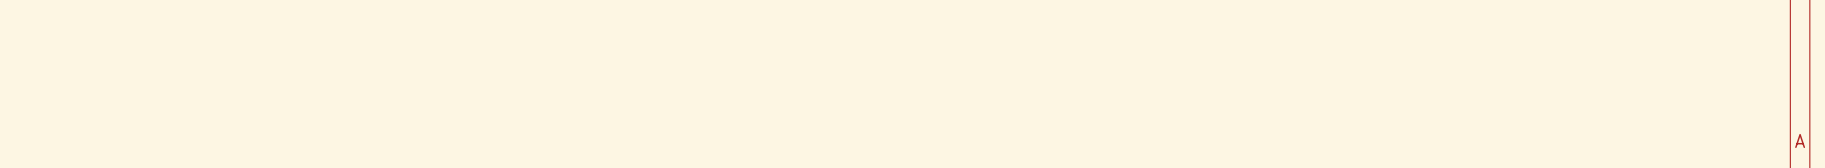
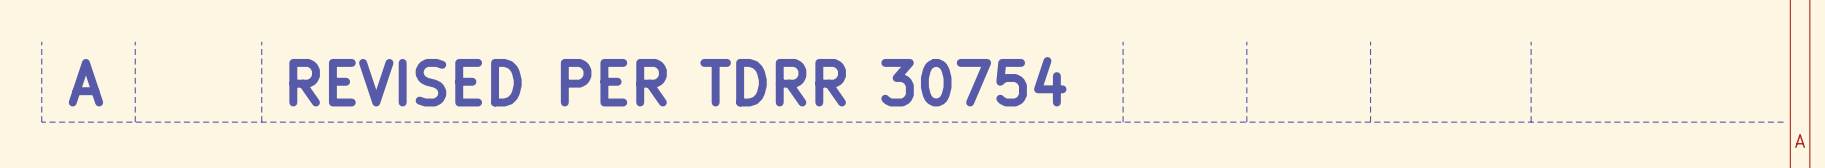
line: none -> (41, 41) (41, 122) (1783, 122)
line: none -> (135, 41) (135, 122)
line: none -> (261, 41) (261, 122)
line: none -> (1123, 41) (1123, 122)
line: none -> (1246, 41) (1246, 122)
line: none -> (1370, 41) (1370, 122)
line: none -> (1531, 41) (1531, 122)
text: none -> A REVISED PER TDRR 30754 (567, 81)

